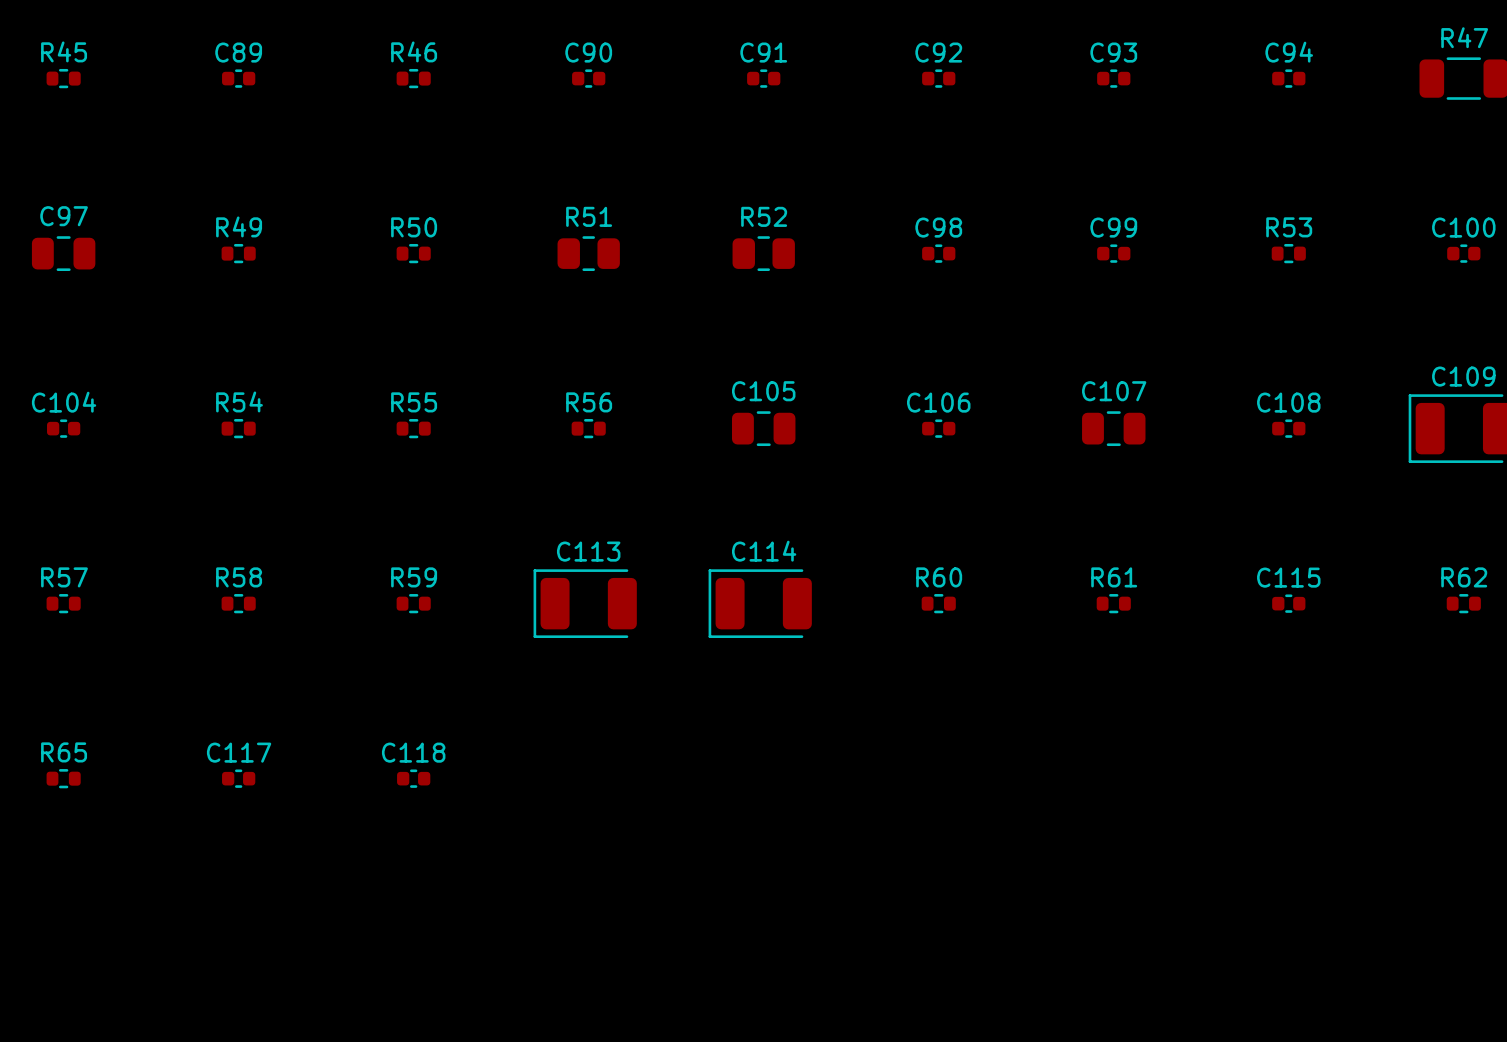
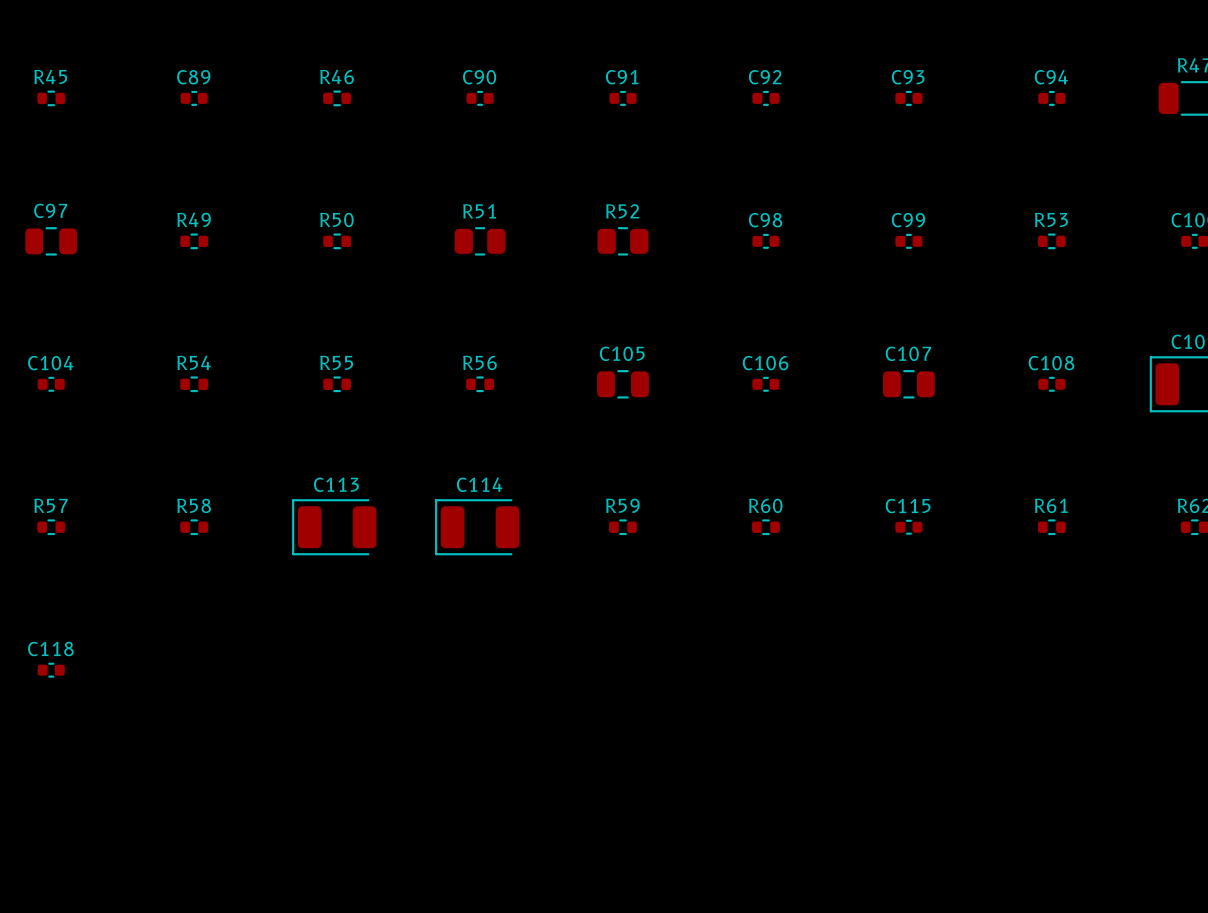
C113 name: C113 (588, 551) -> C114 (479, 484)
C113: none -> (334, 527)
R59 position: (413, 603) -> (623, 527)
C114: (760, 603) -> none
R61 position: (1113, 603) -> (1051, 527)
C115 position: (1288, 603) -> (908, 527)
R65: (63, 778) -> none
C117: (238, 778) -> none
C118 position: (413, 778) -> (51, 670)

